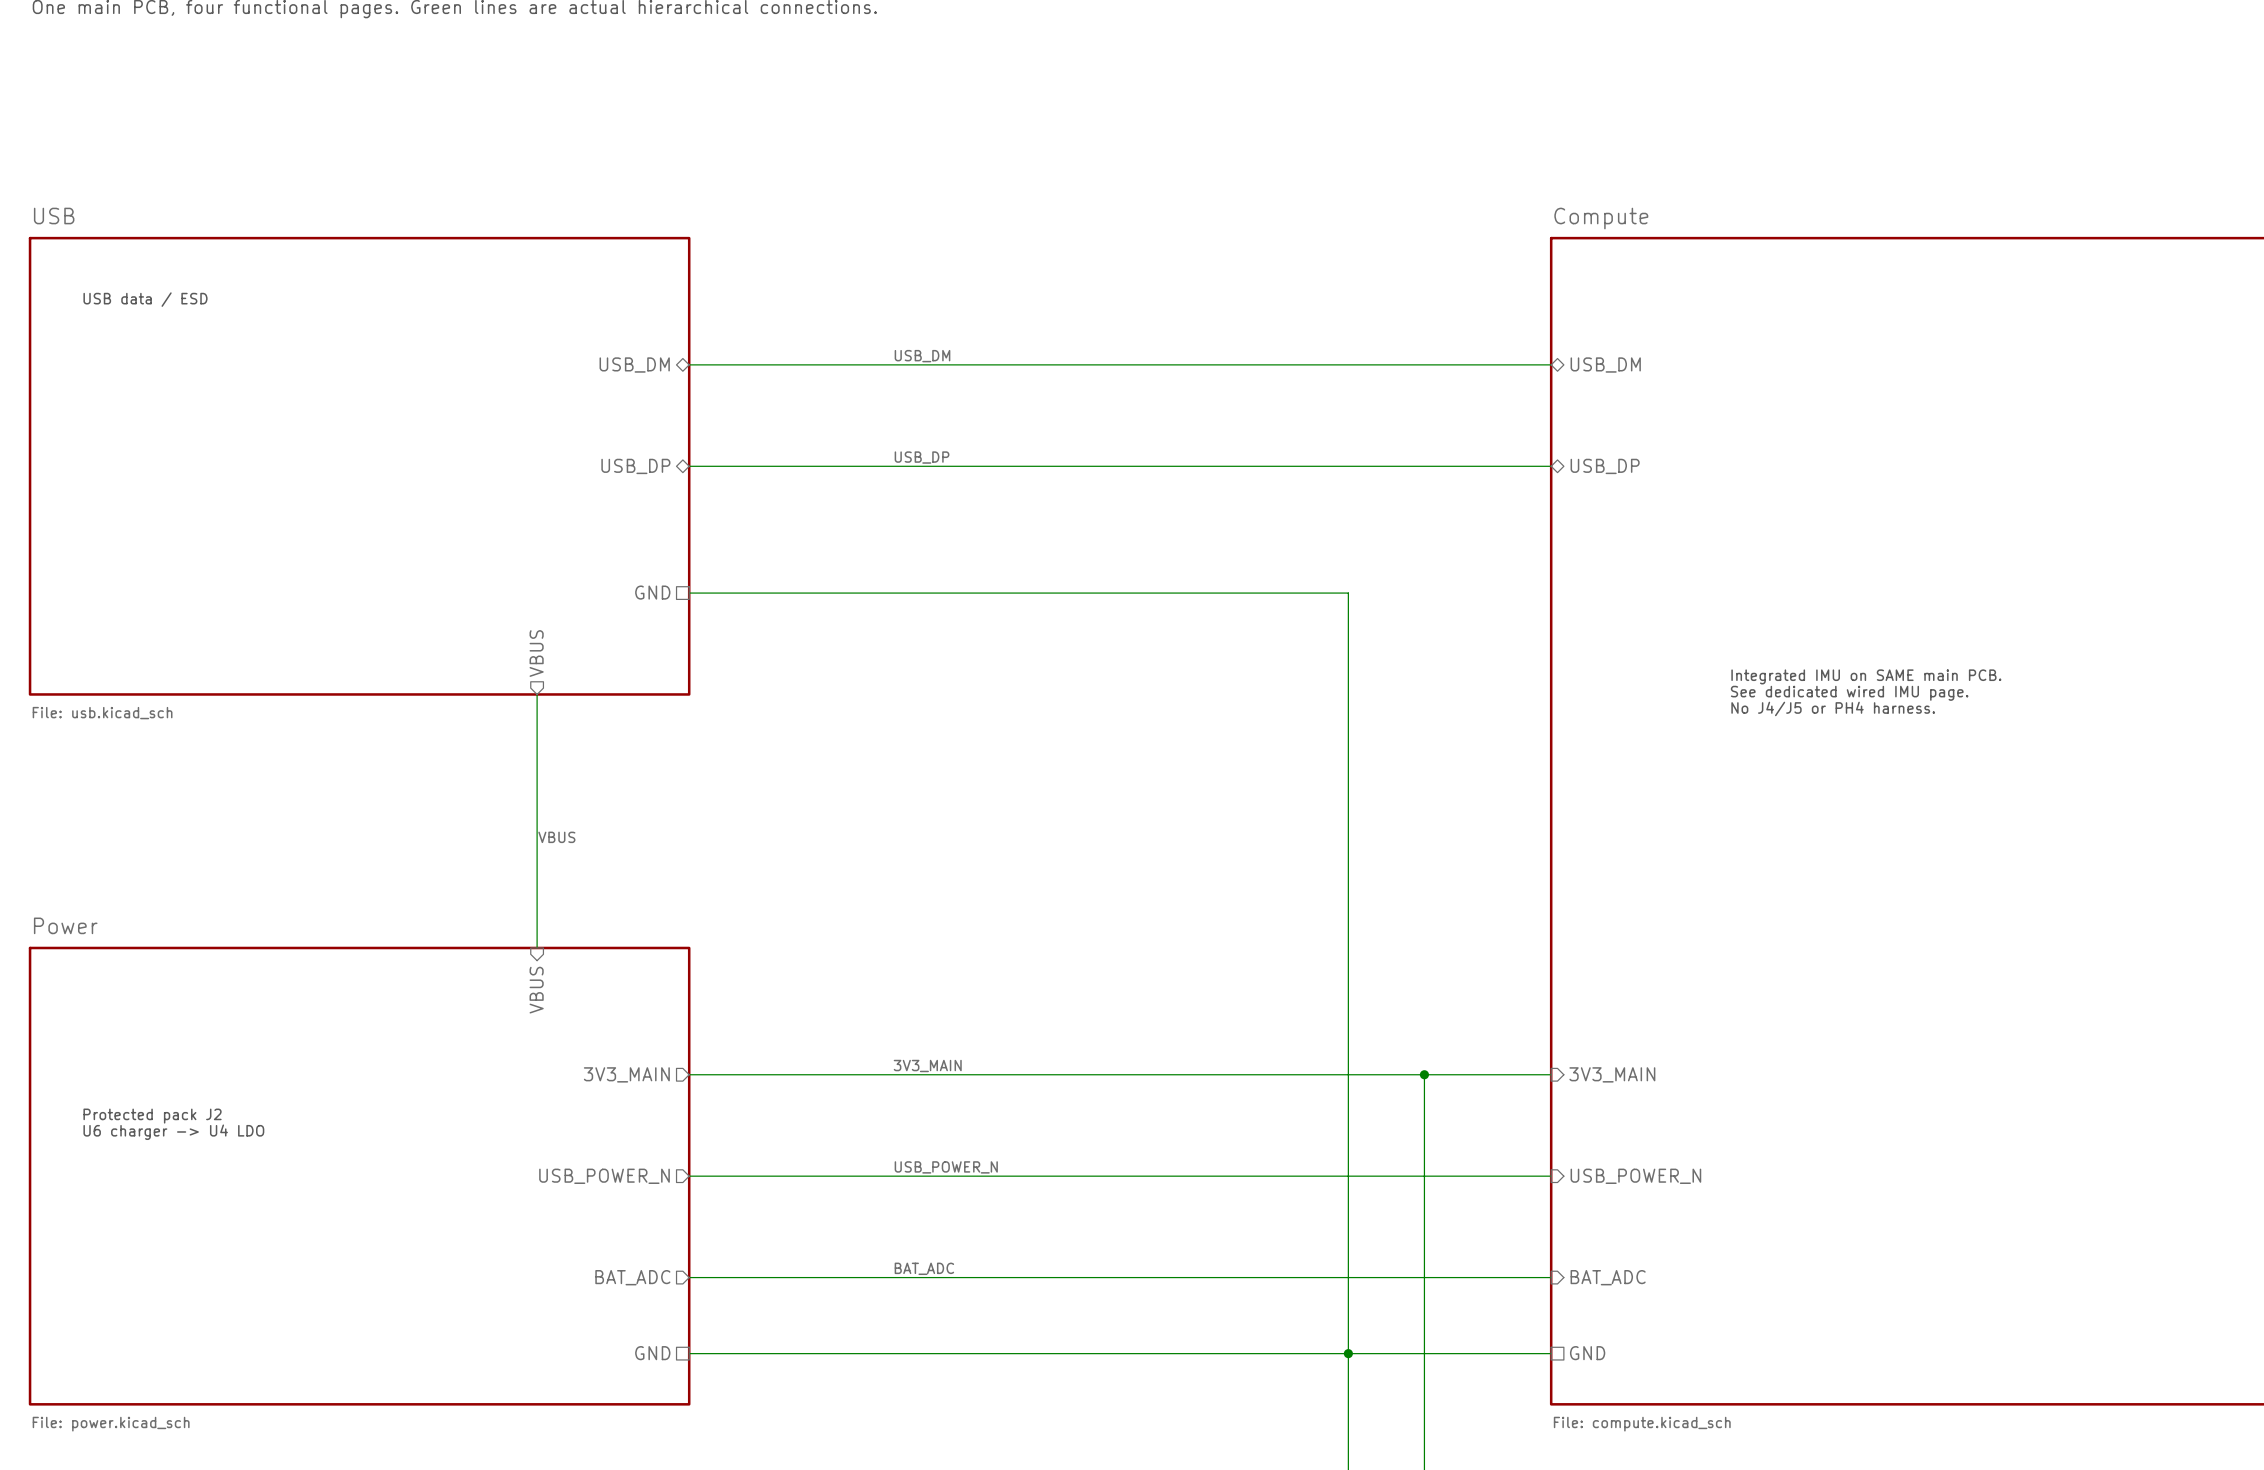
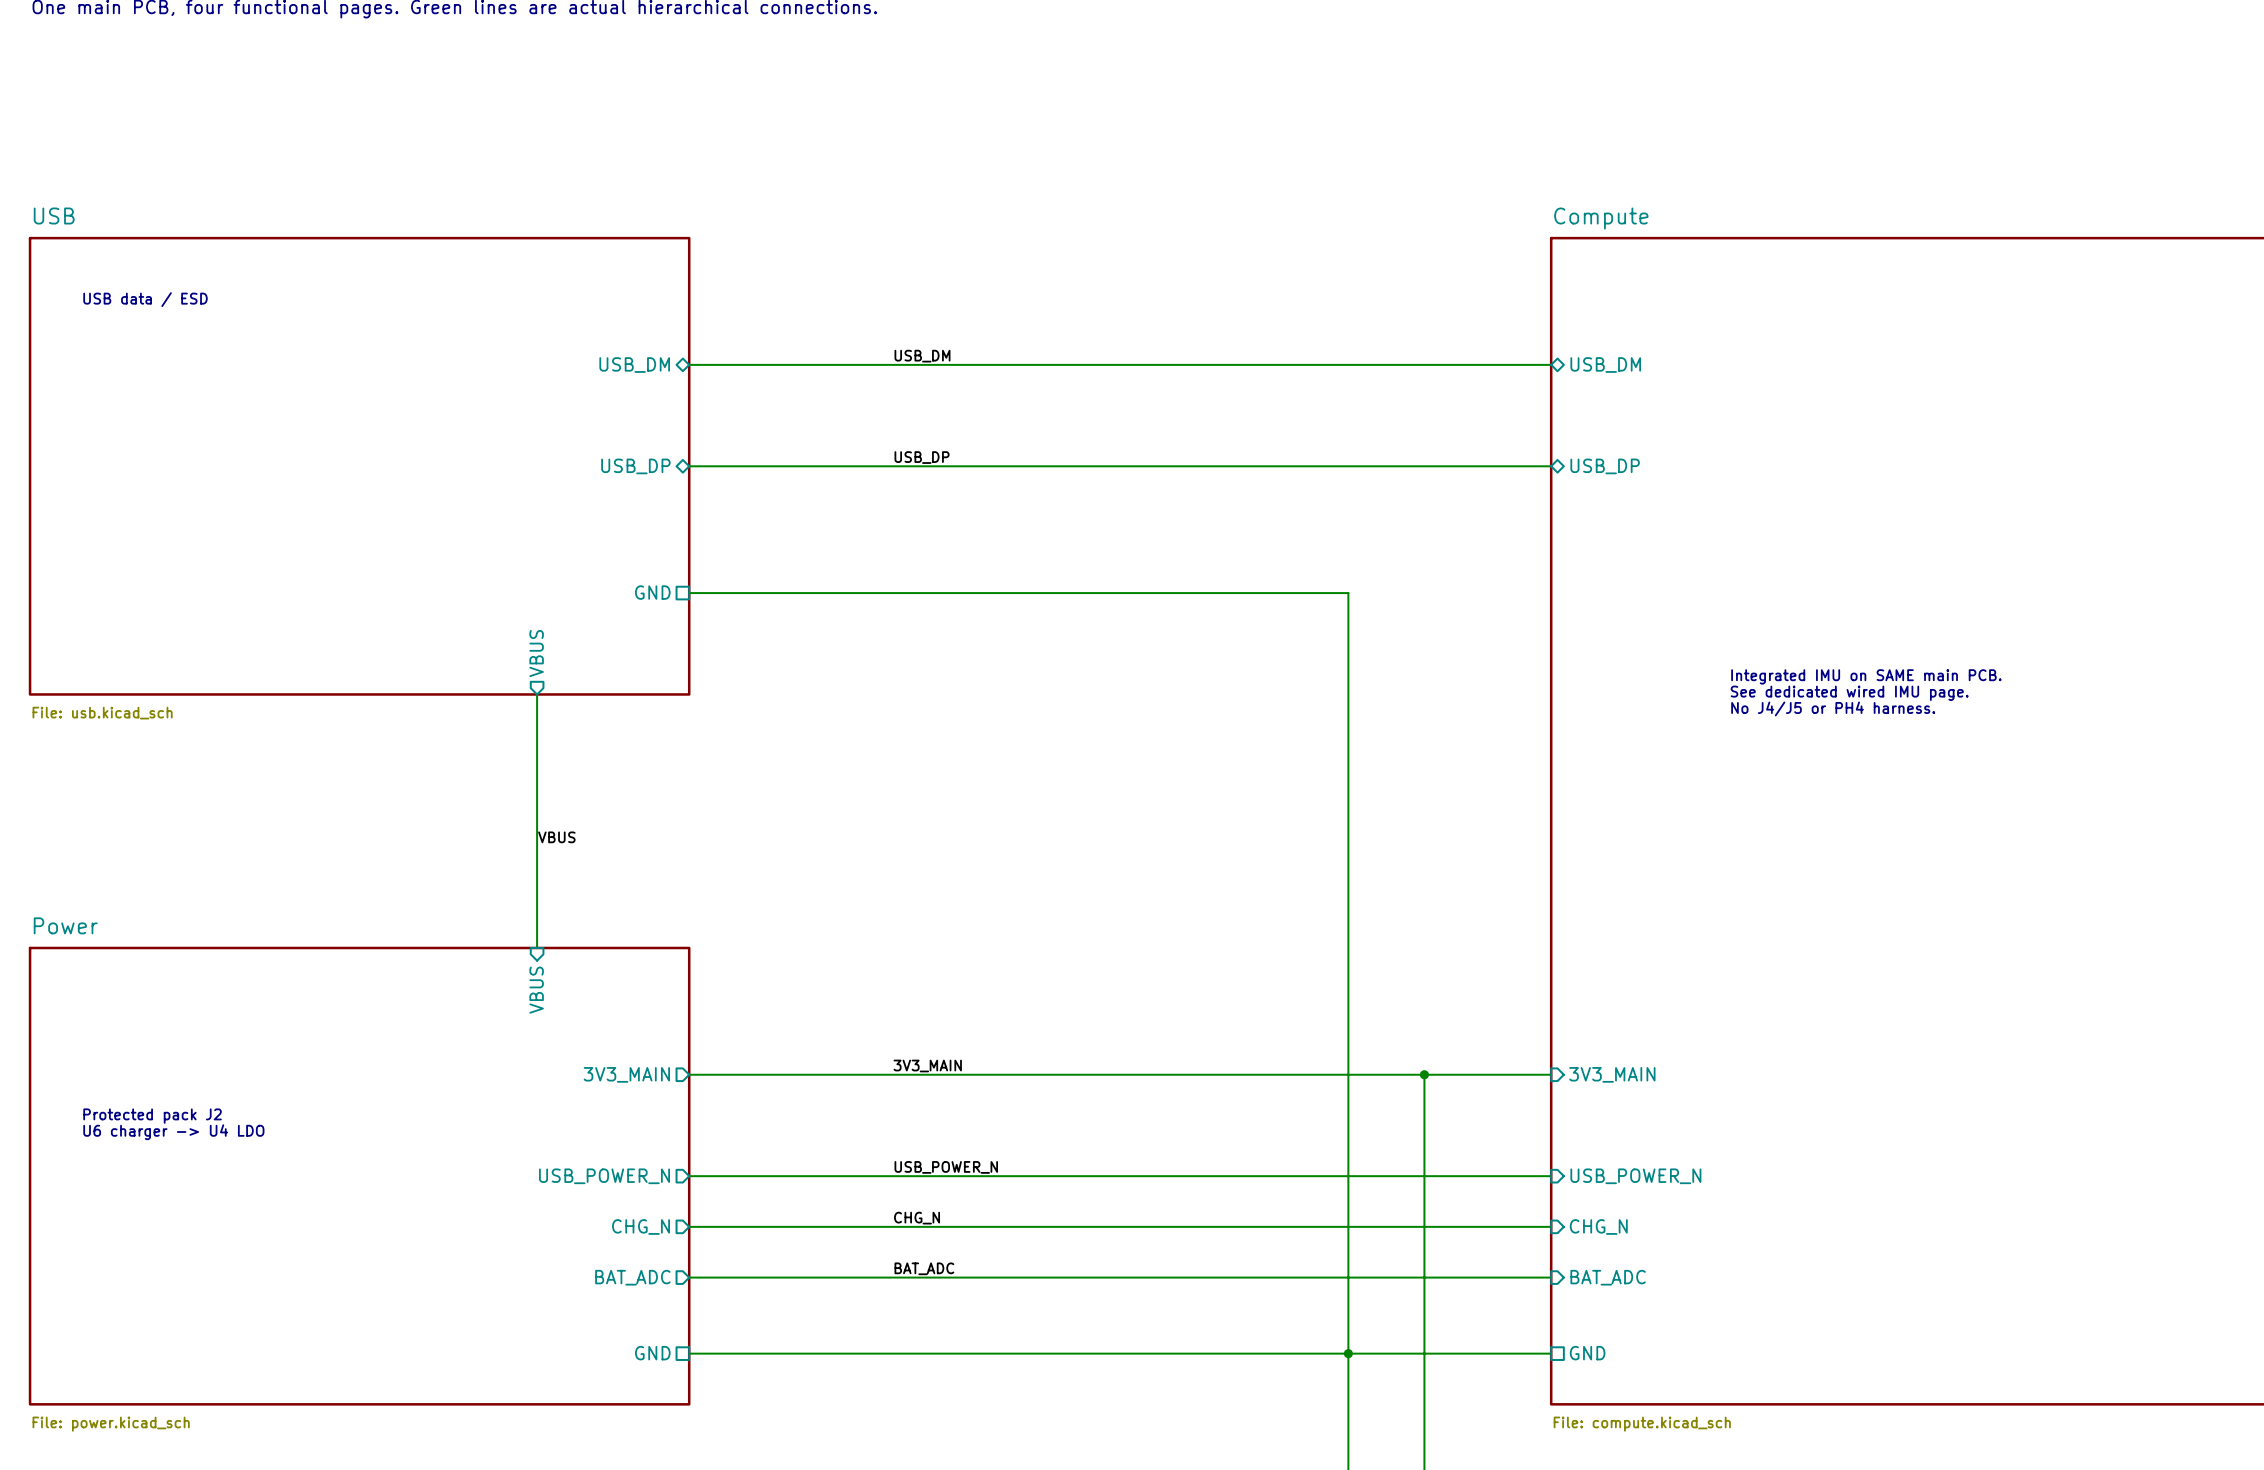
label: none -> CHG_N (917, 1218)
wire: none -> (689, 1226) (1551, 1226)
sheet pin: none -> CHG_N (641, 1227)
sheet pin: none -> CHG_N (1598, 1227)

